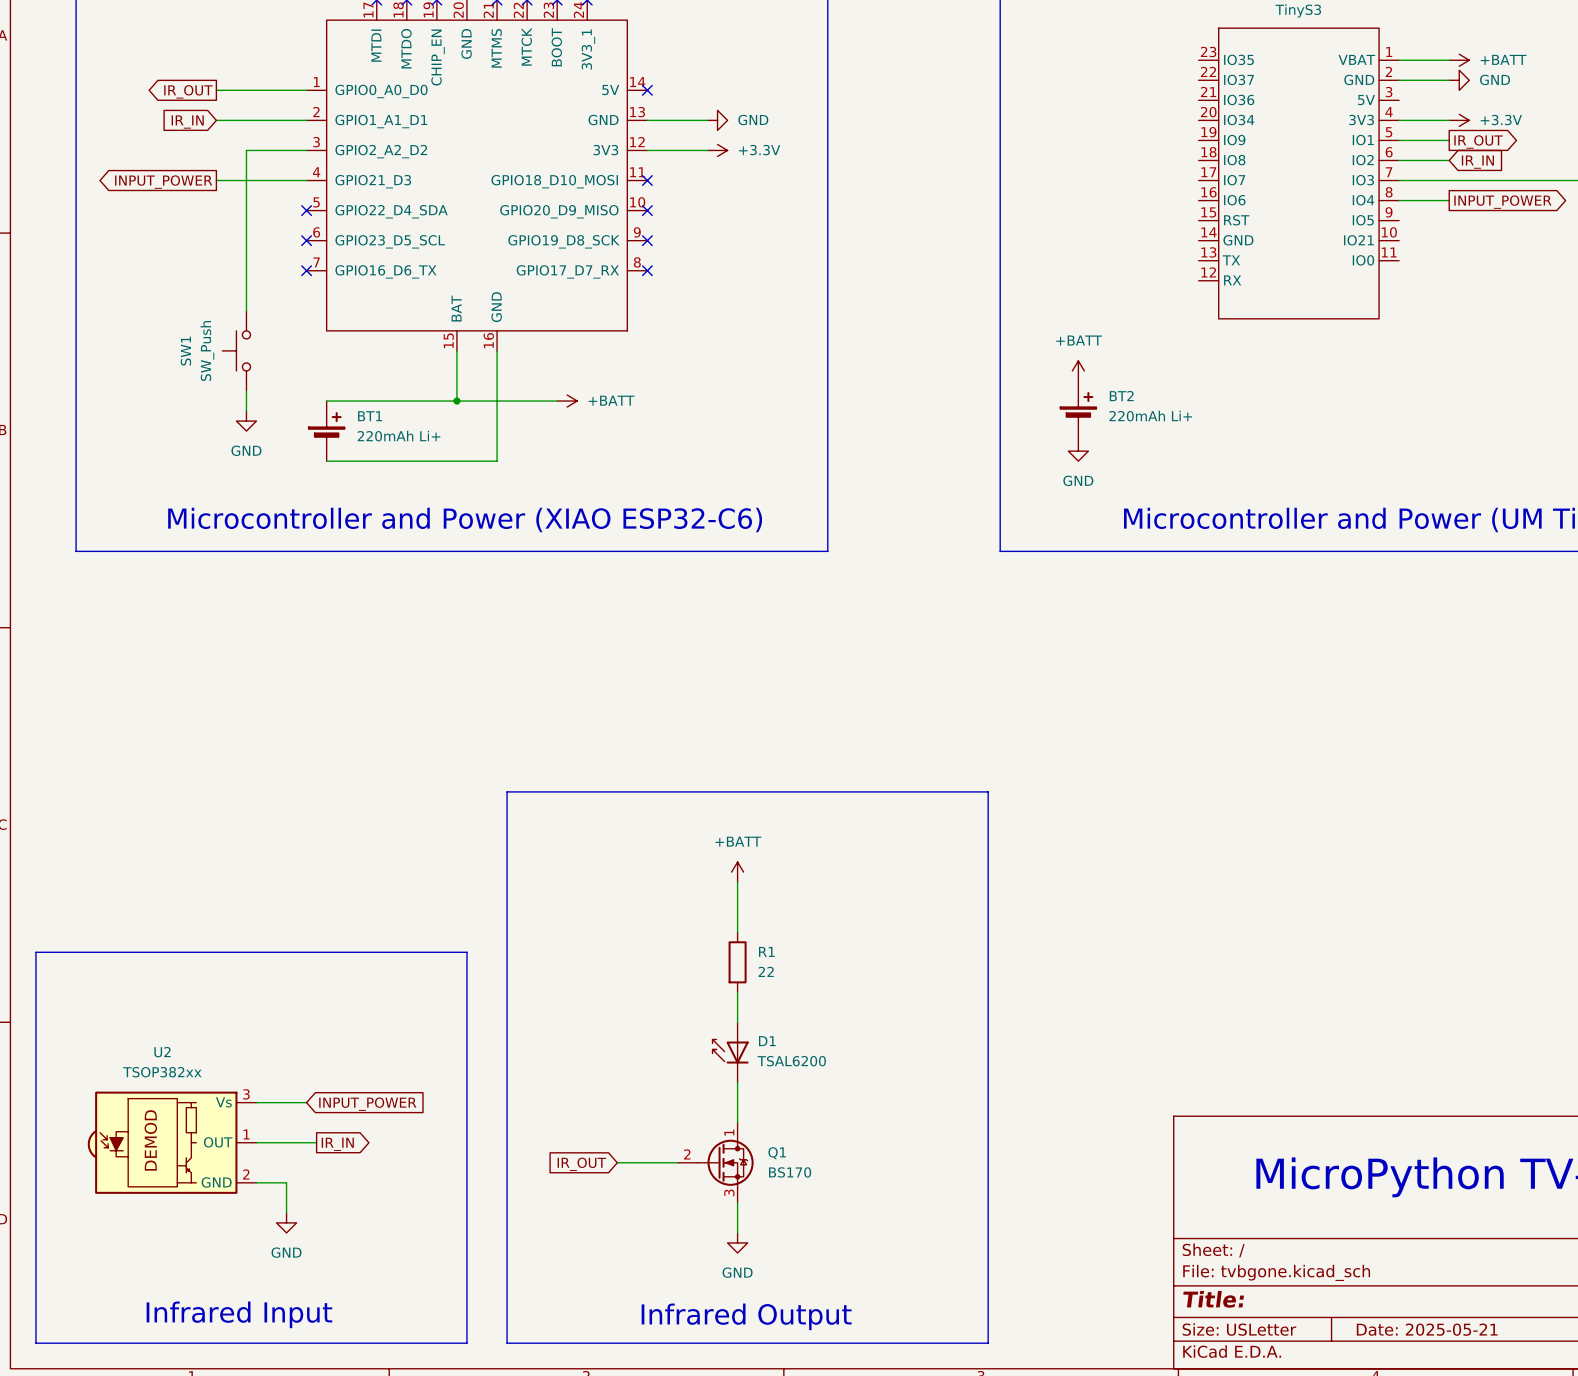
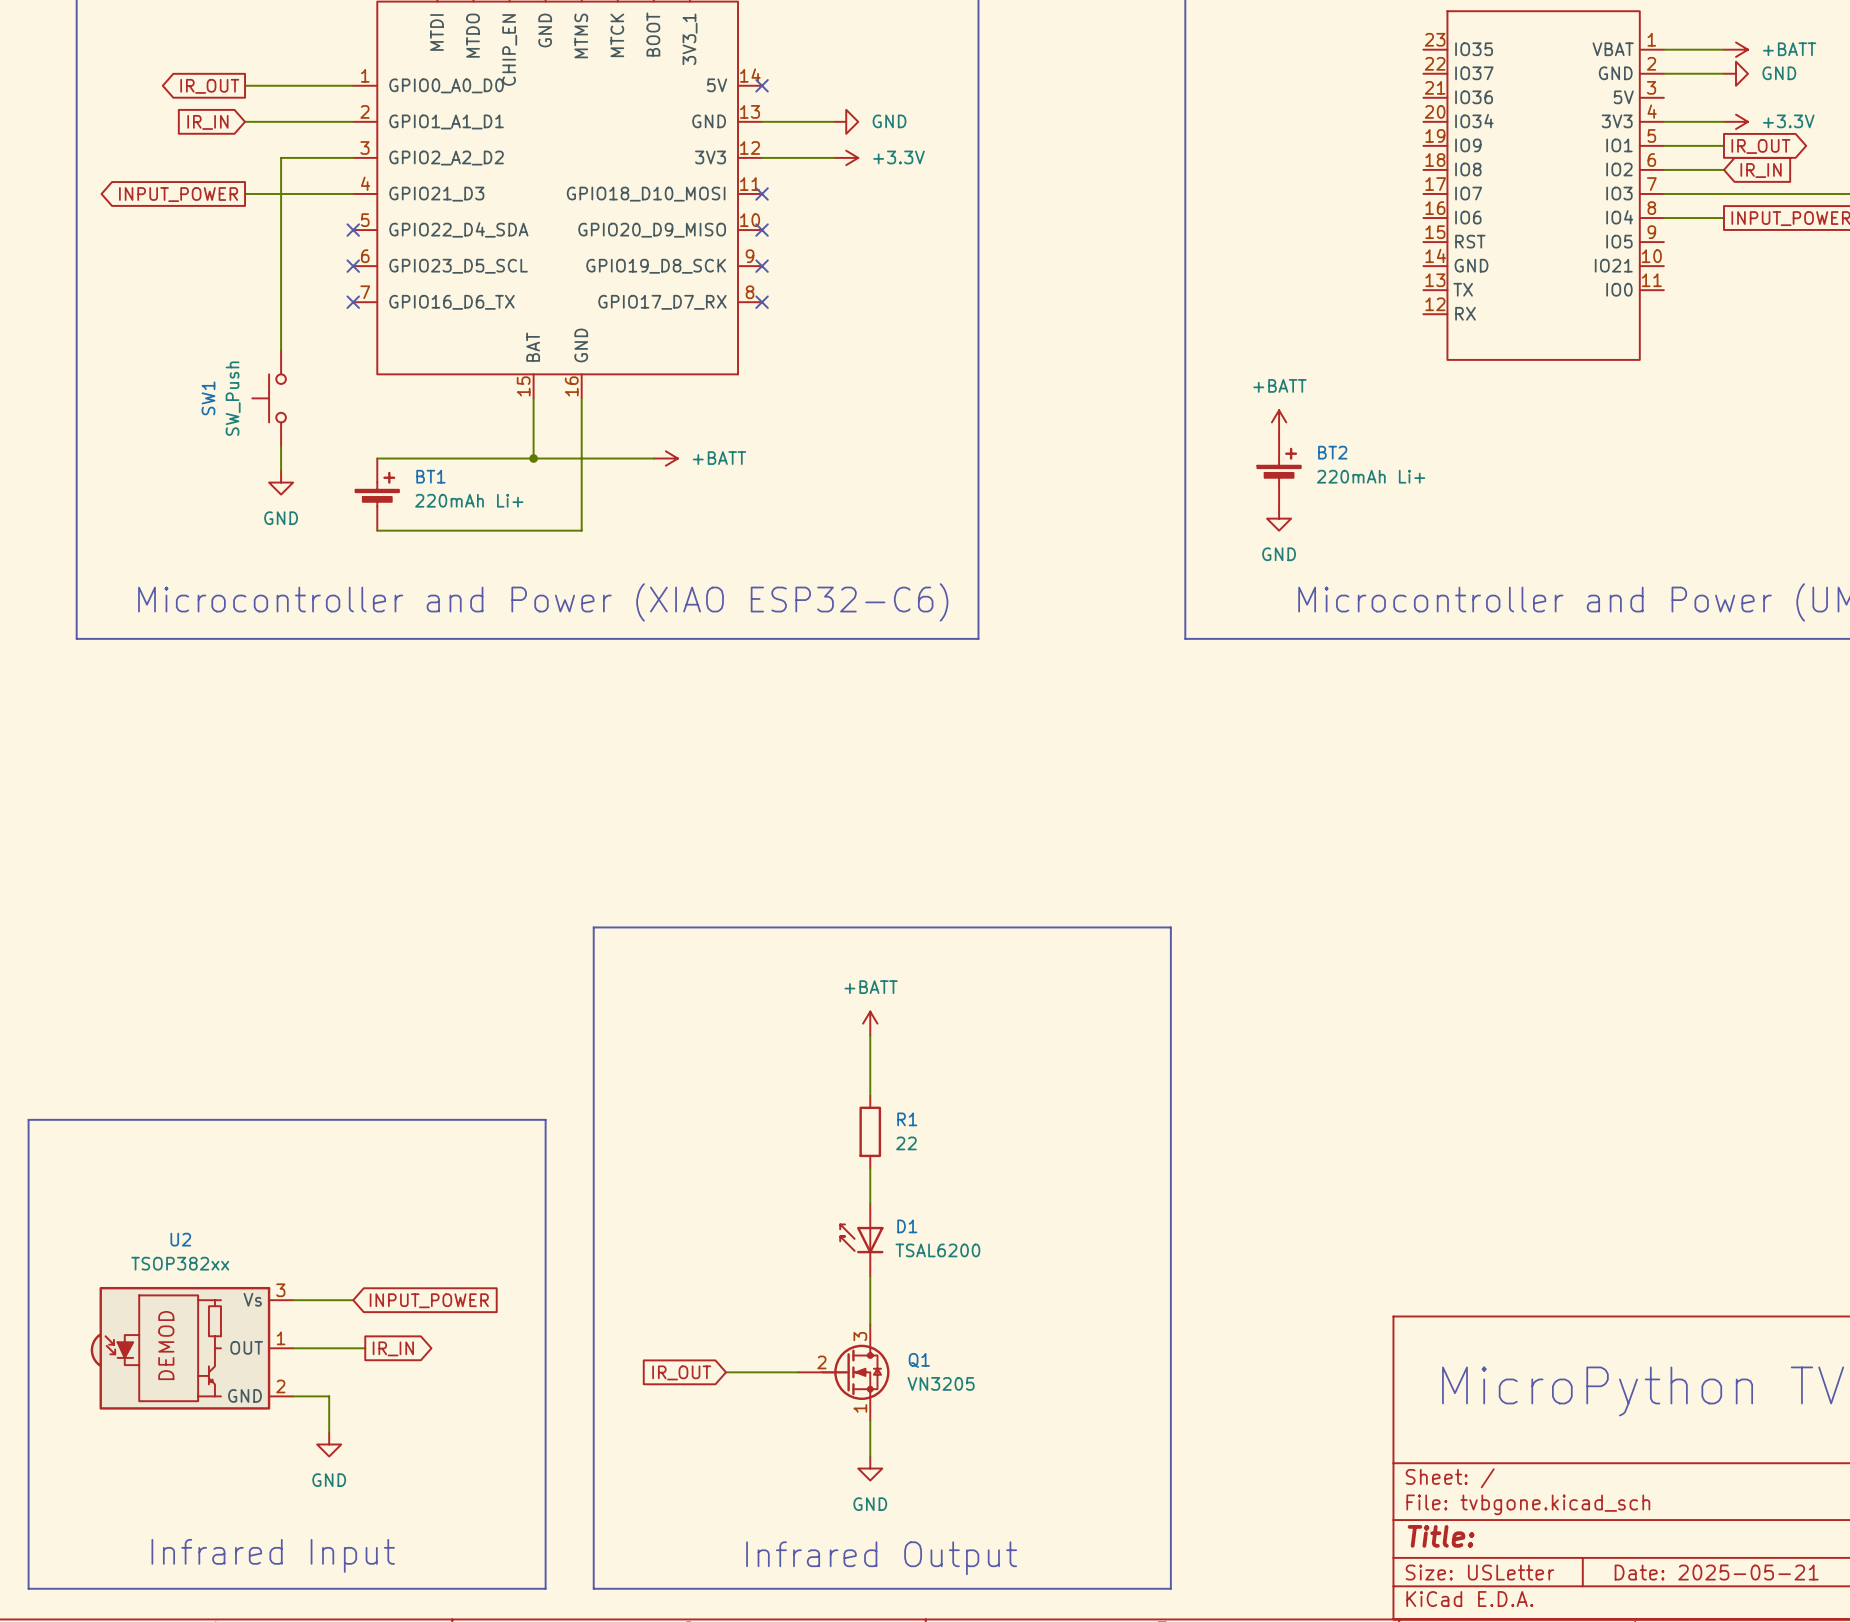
Q1 symbol: [677, 1122, 754, 1203] -> [798, 1324, 890, 1421]
Q1 value: BS170 (790, 1172) -> VN3205 (941, 1383)

